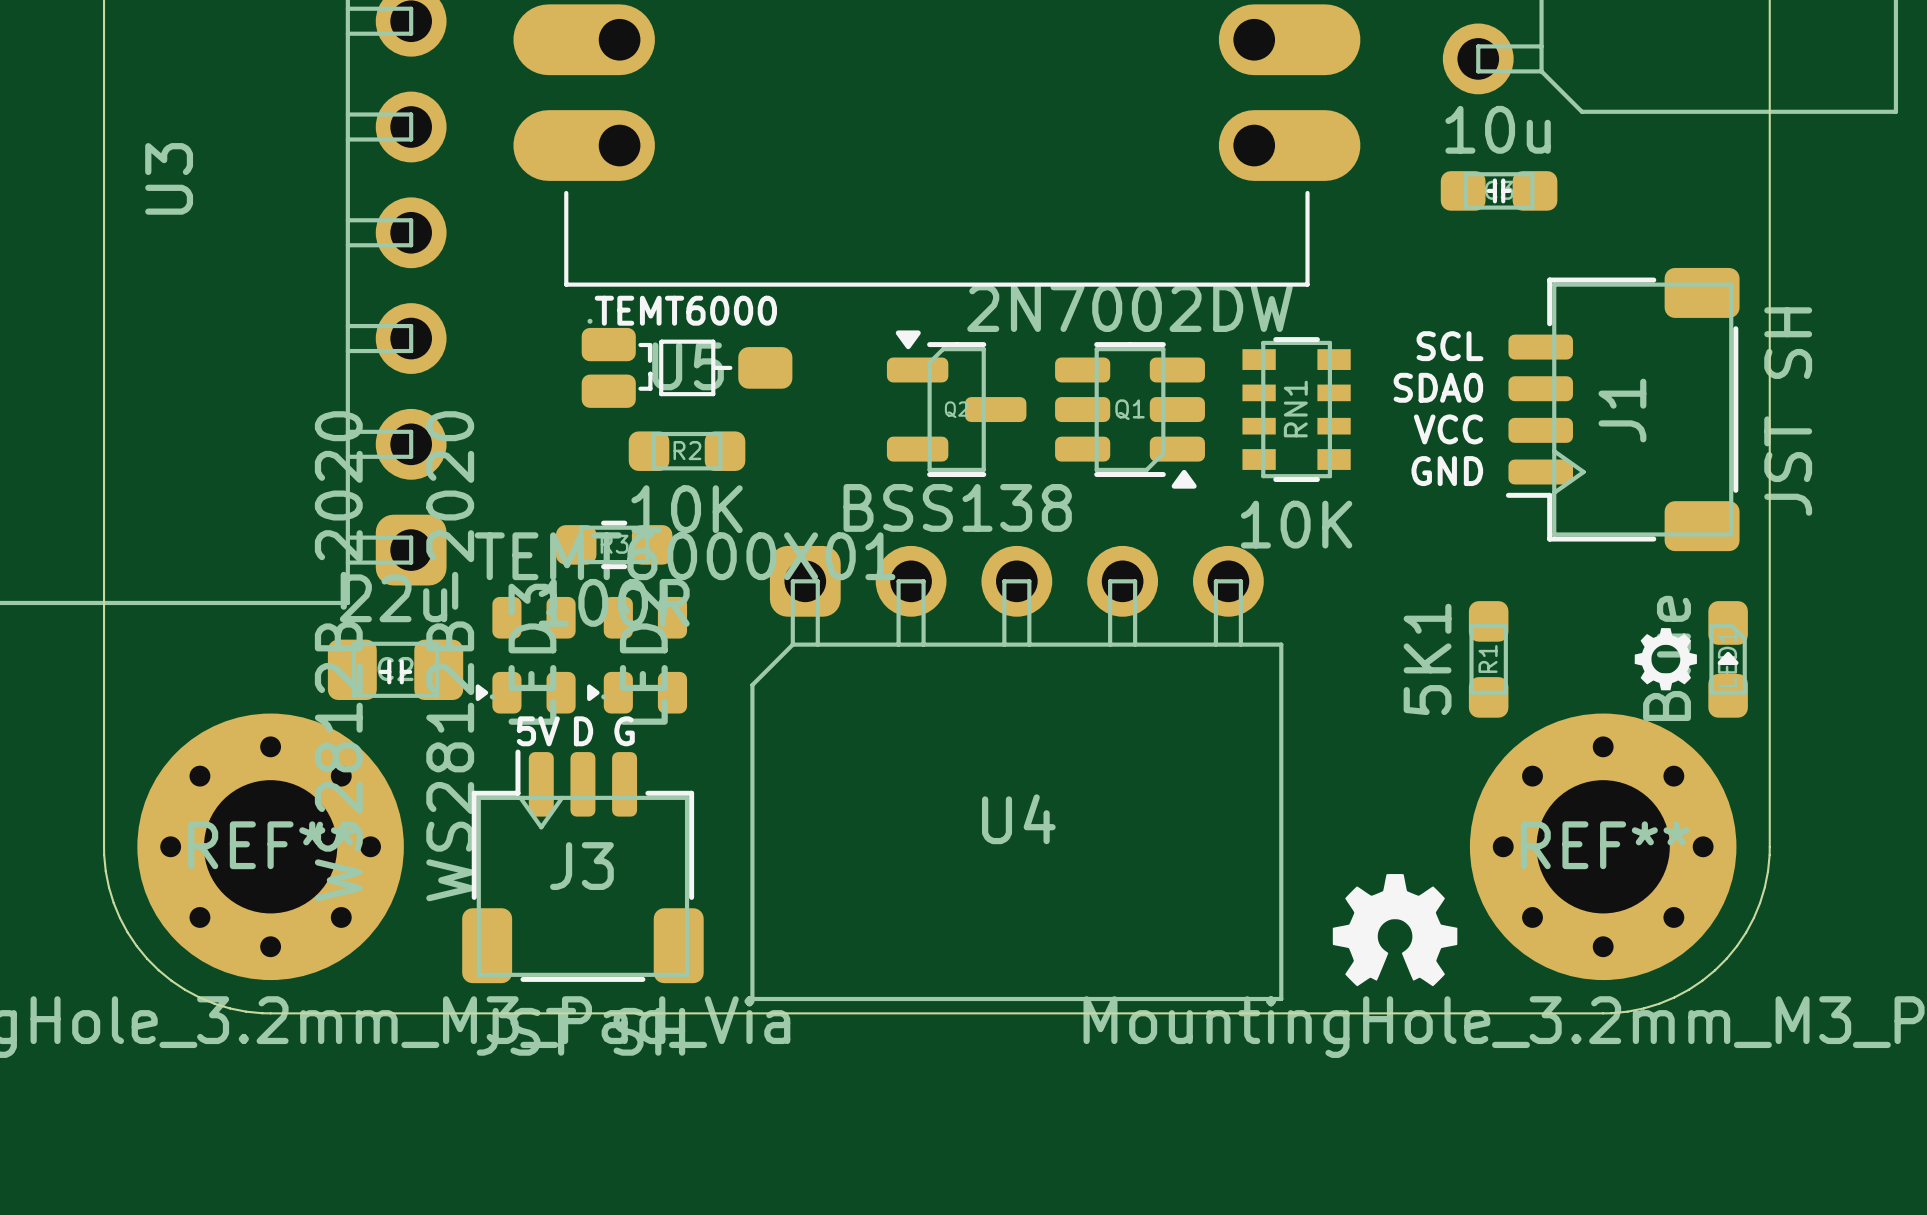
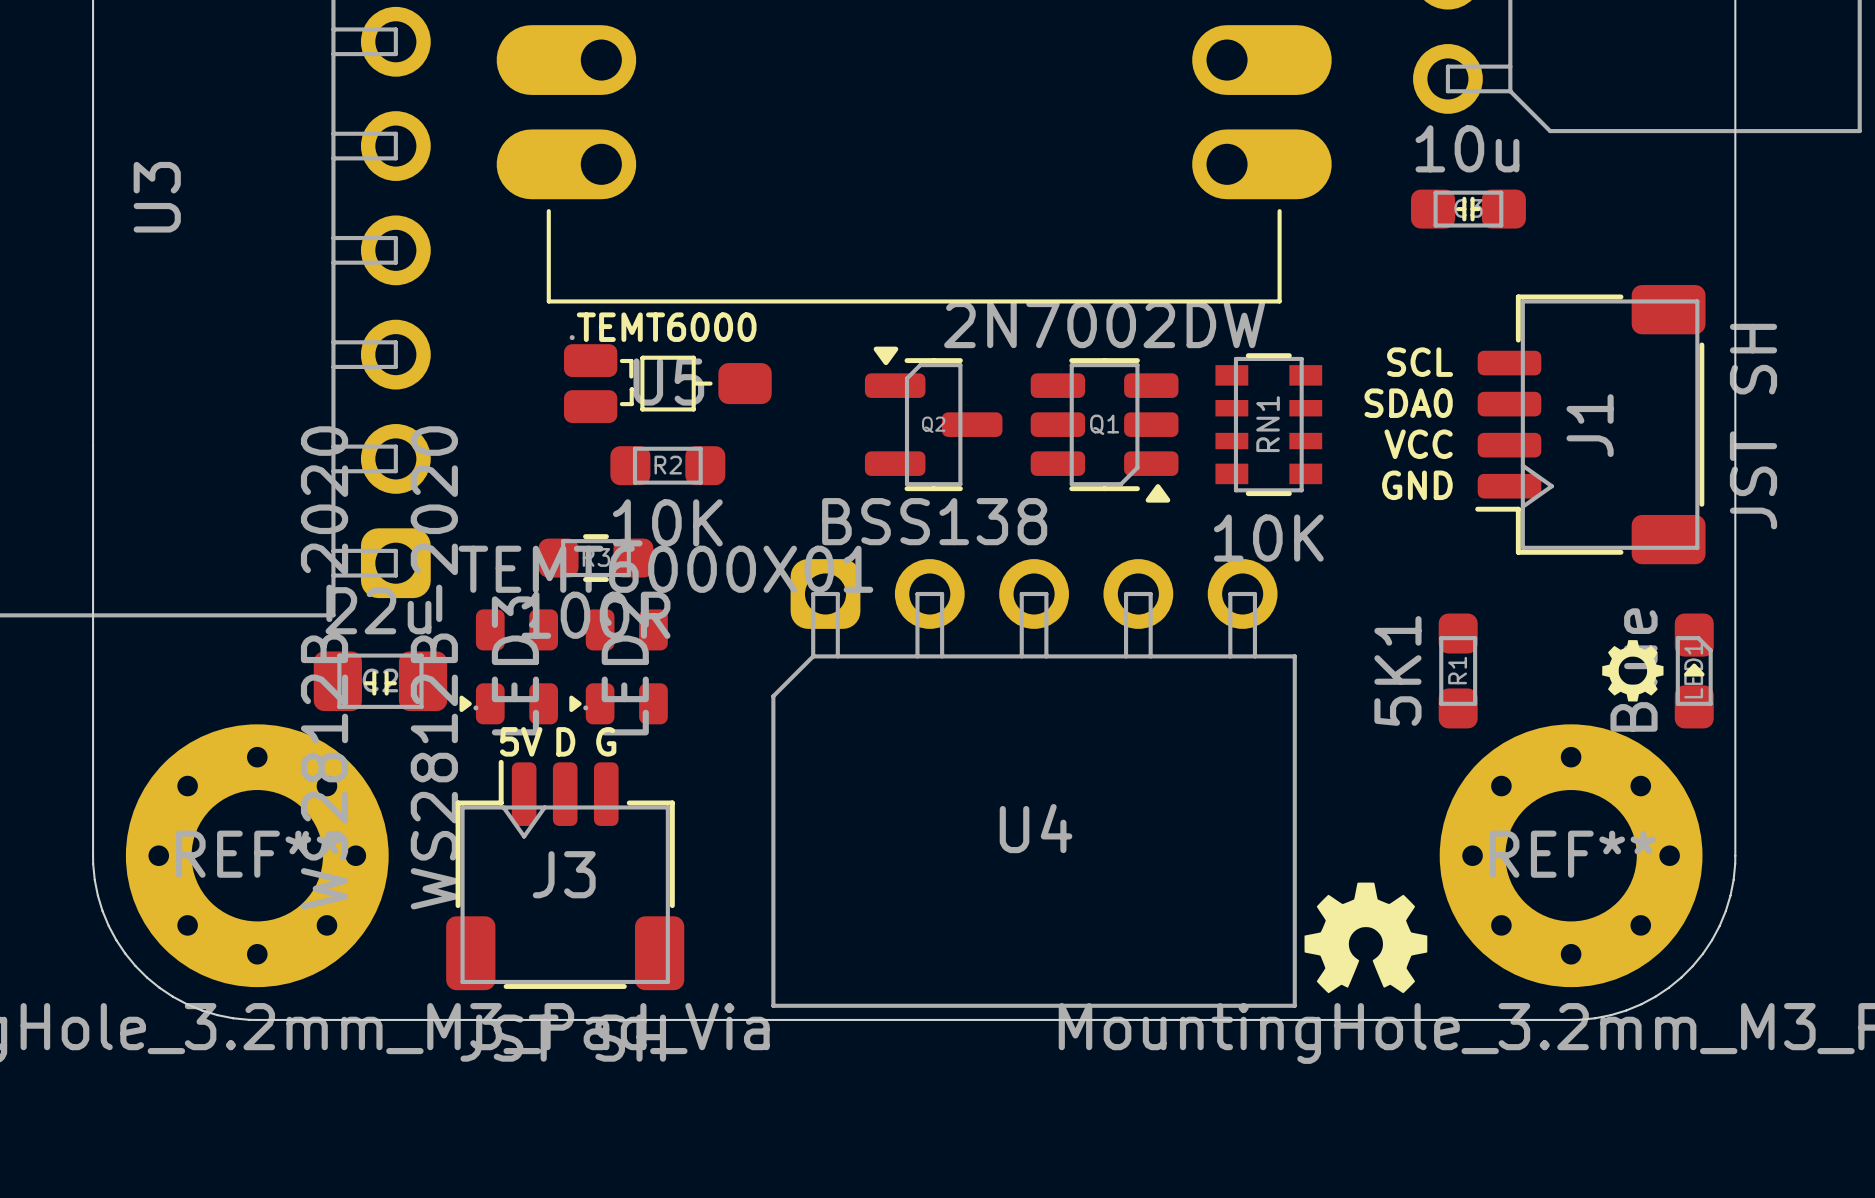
U4 position: (1016, 773) -> (1034, 783)

